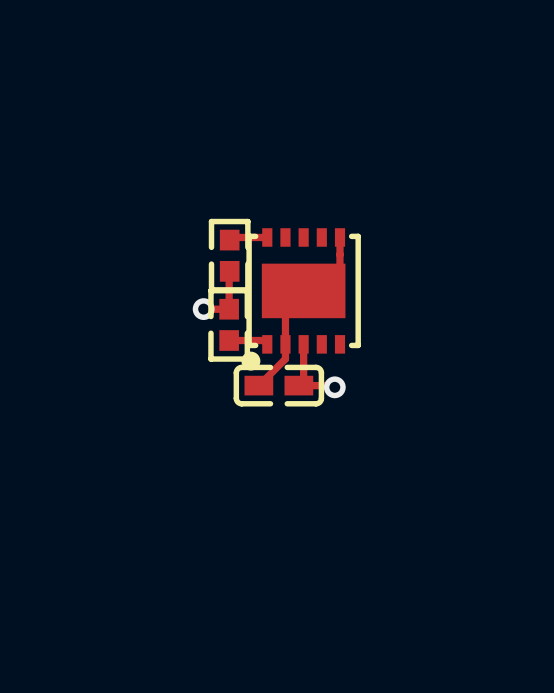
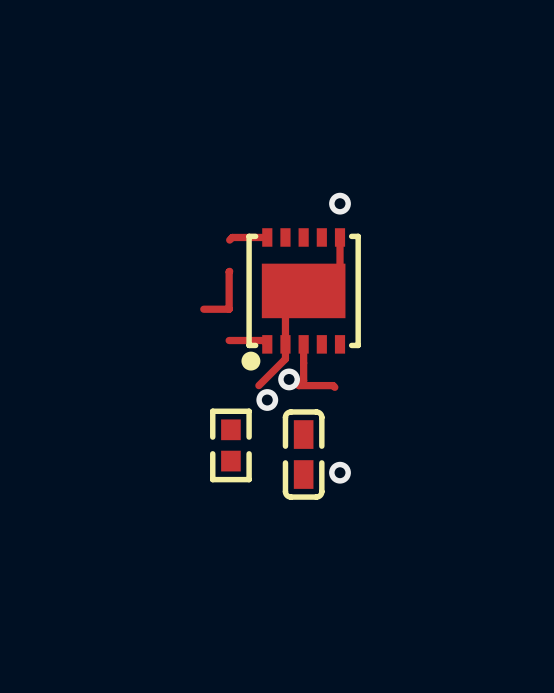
via: none -> (340, 203)
part: (229, 255) -> none
via: (203, 309) -> none
part: (229, 324) -> none
via: none -> (289, 379)
part rotation: 0° (278, 385) -> 90° clockwise (303, 454)
part position: (278, 385) -> (303, 454)
via: (334, 387) -> none
via: none -> (267, 399)
part: none -> (230, 445)
via: none -> (340, 472)

